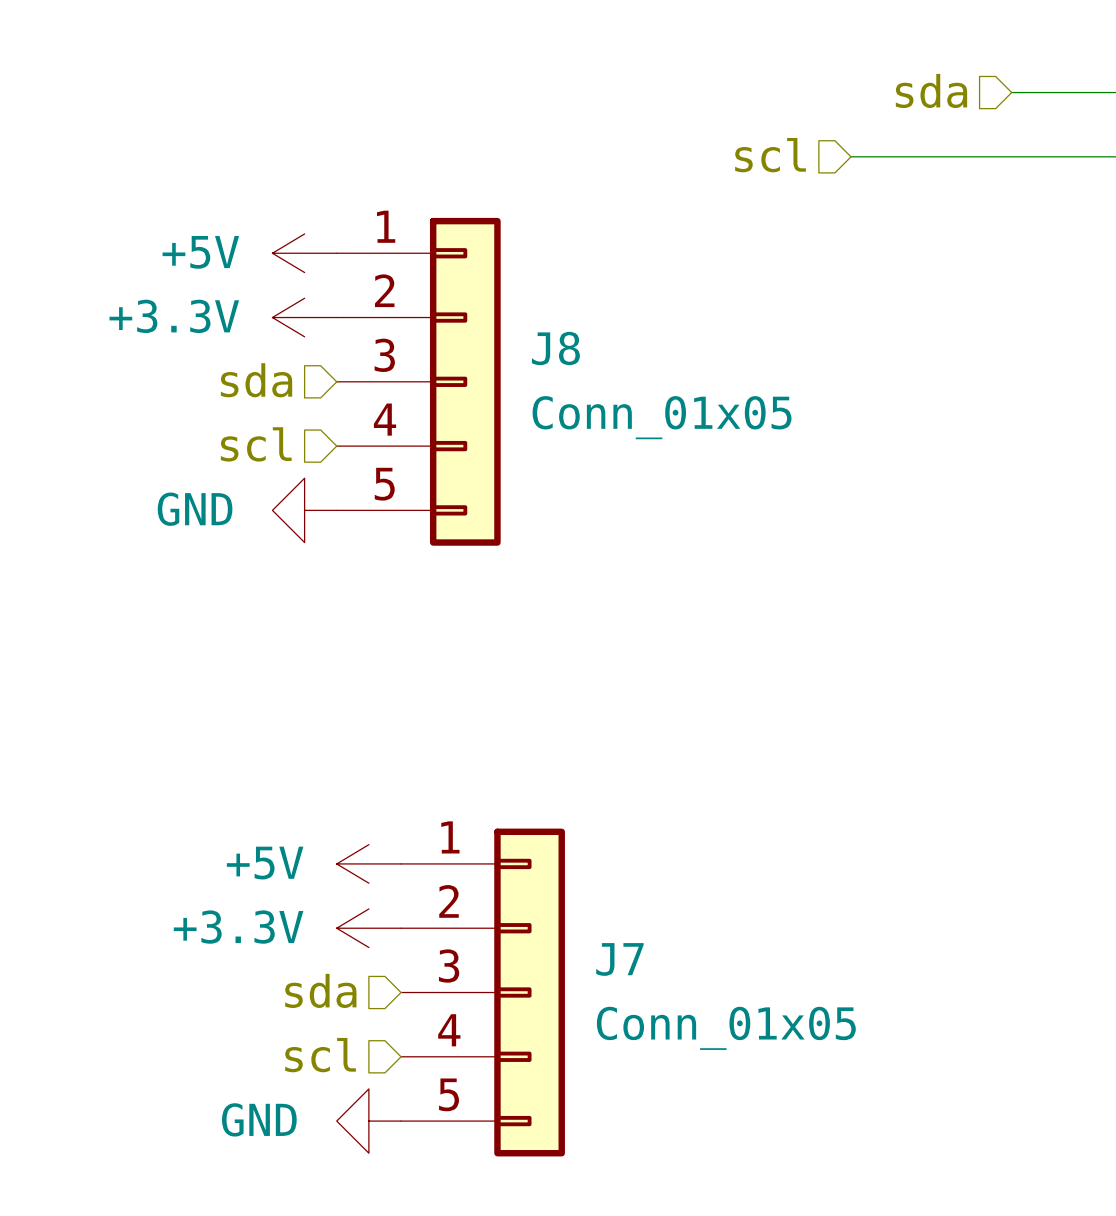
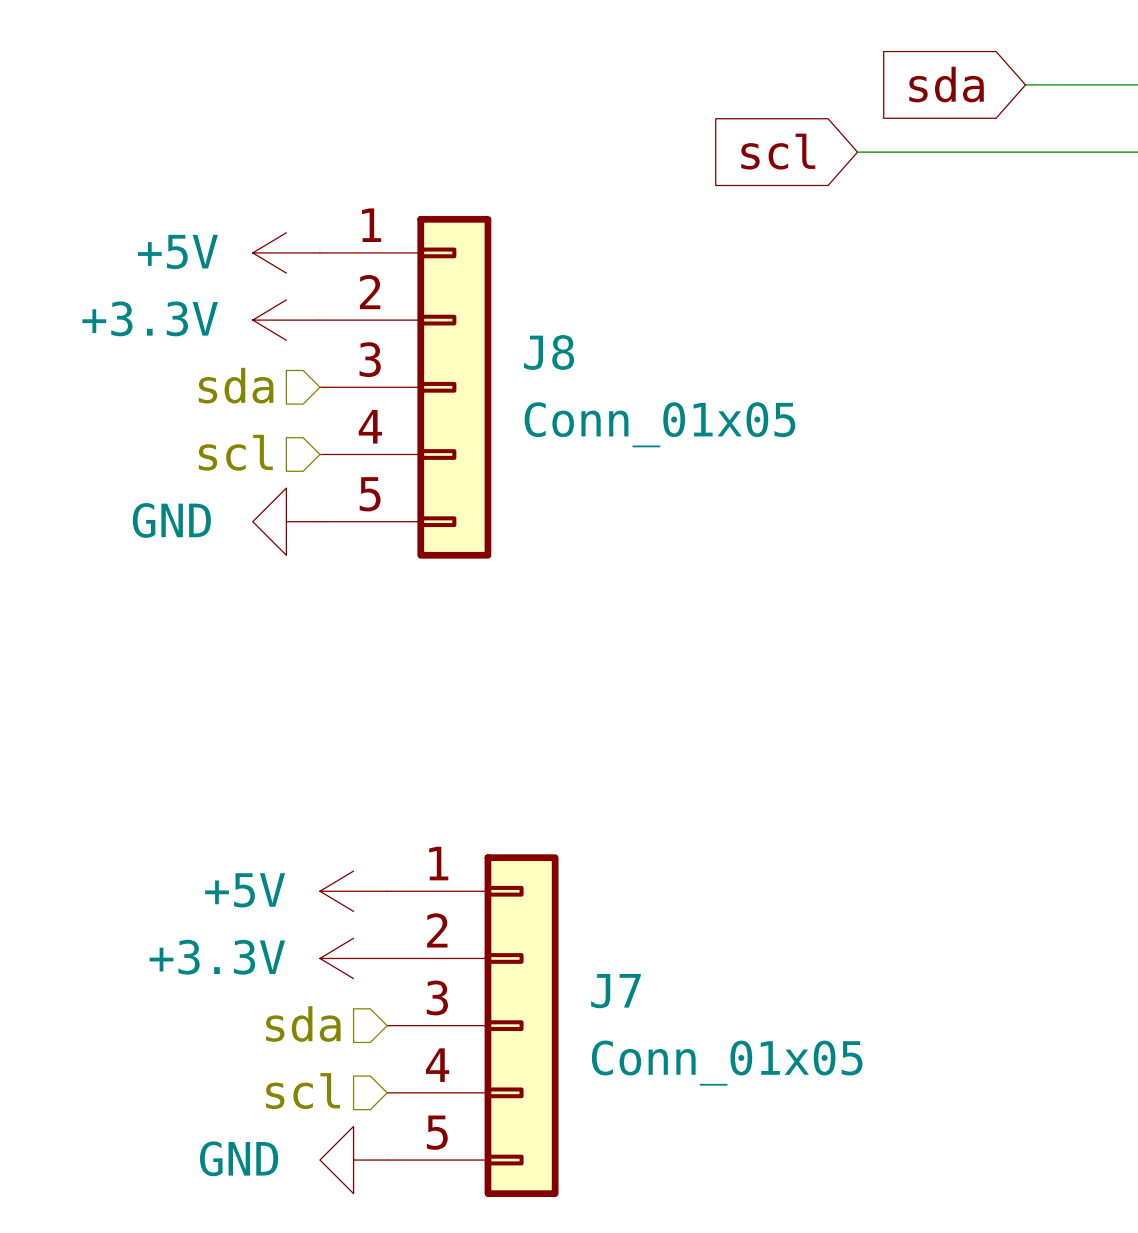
hierarchical label: sda (931, 90) -> none
global label: none -> sda (946, 84)
hierarchical label: scl (770, 155) -> none
global label: none -> scl (778, 151)

